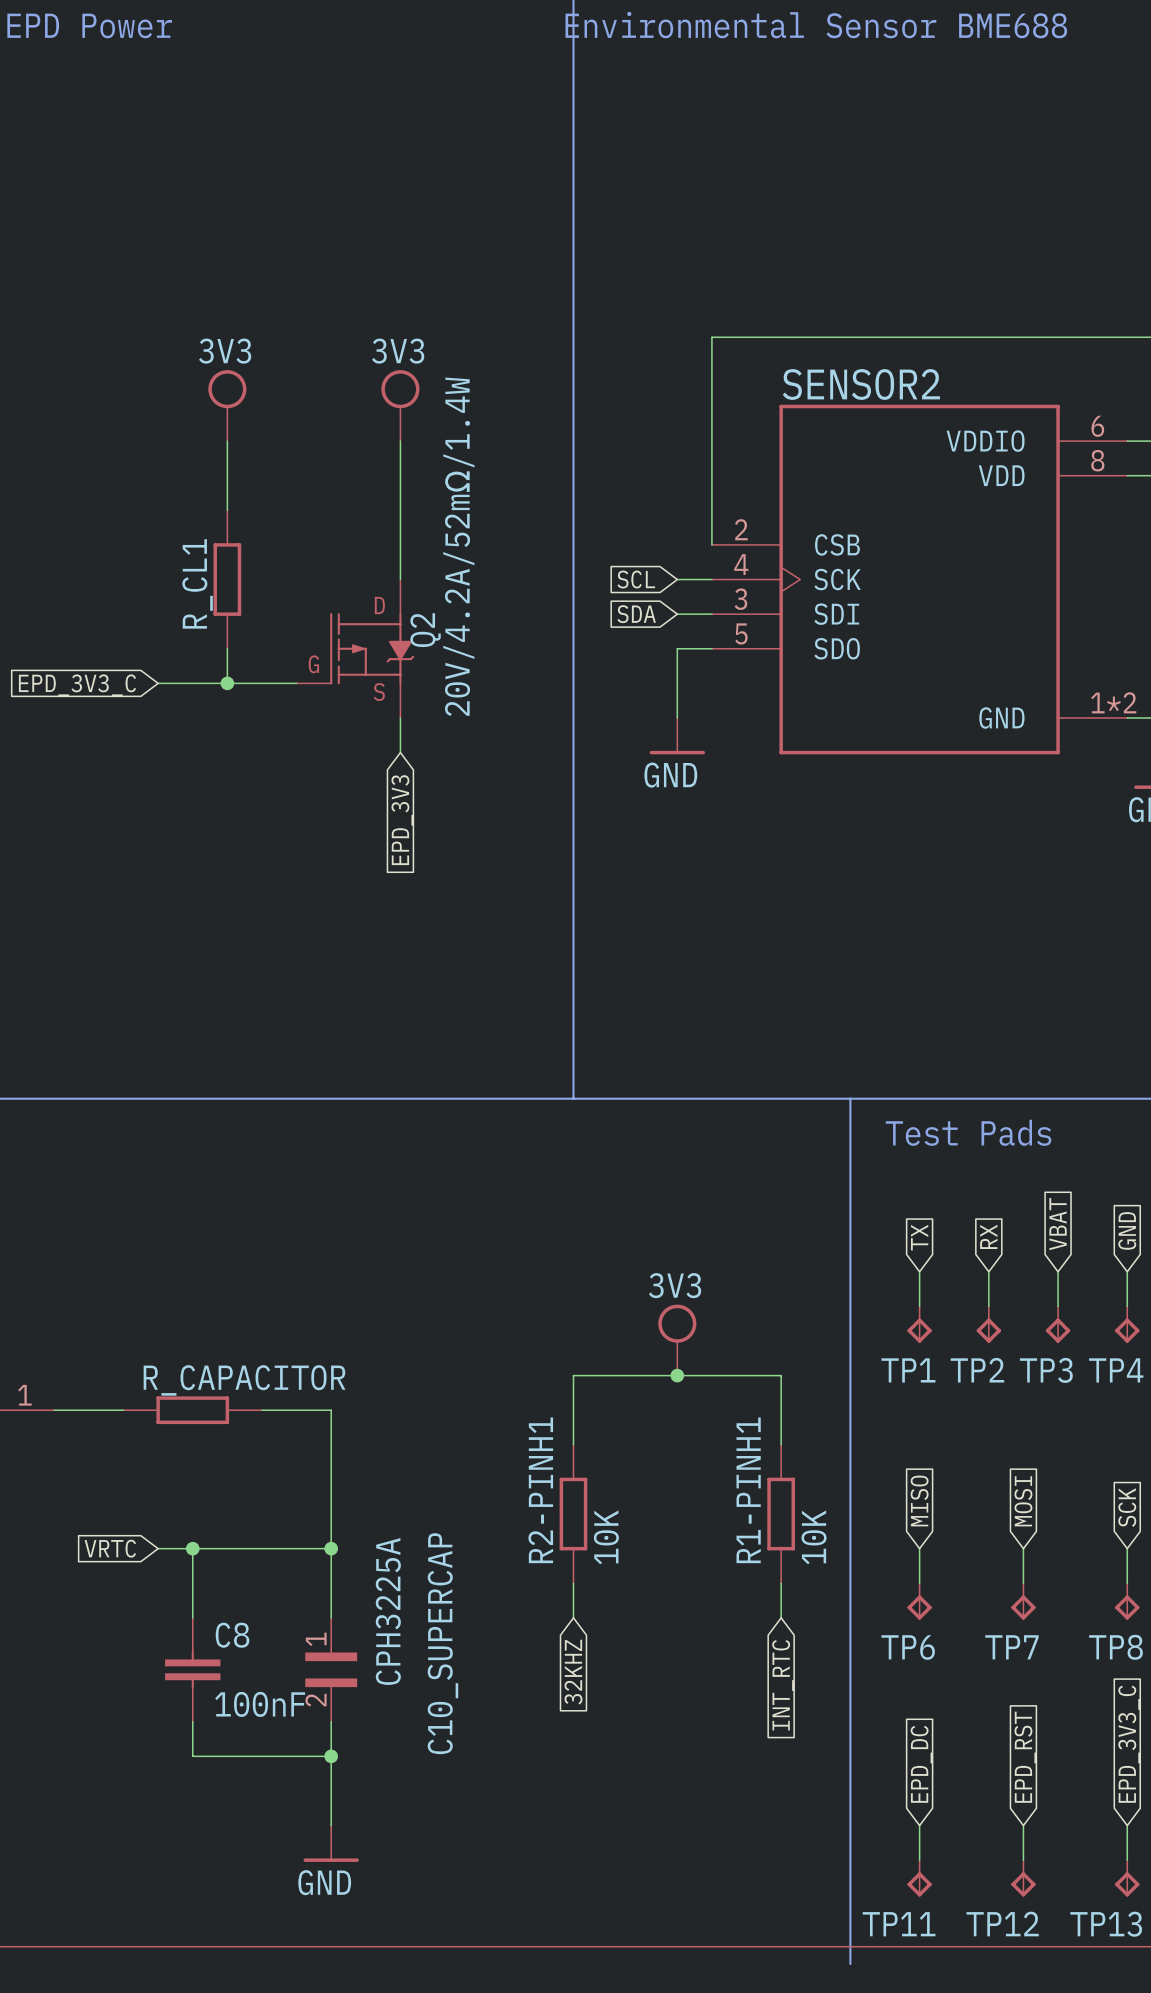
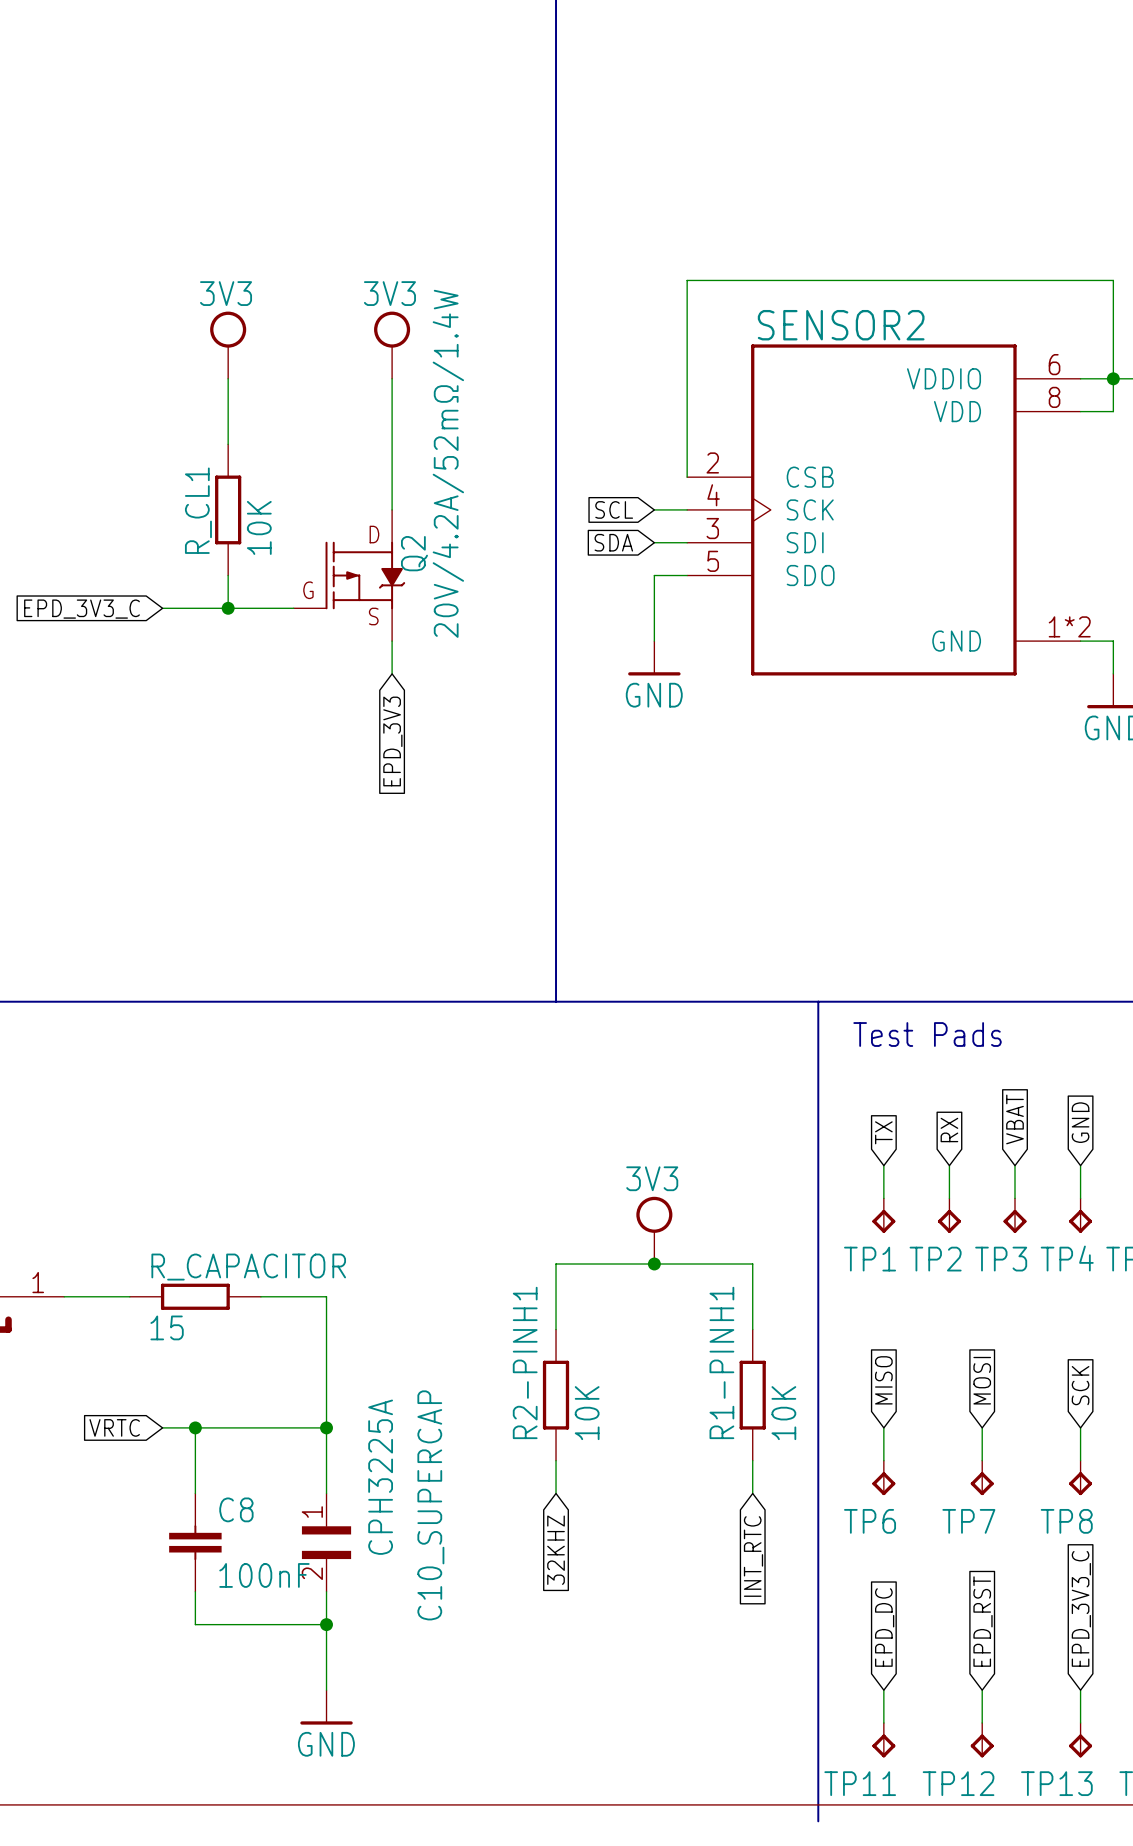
R_CL1 value: none -> 10K (259, 527)
R_CAPACITOR value: none -> 15 (167, 1327)

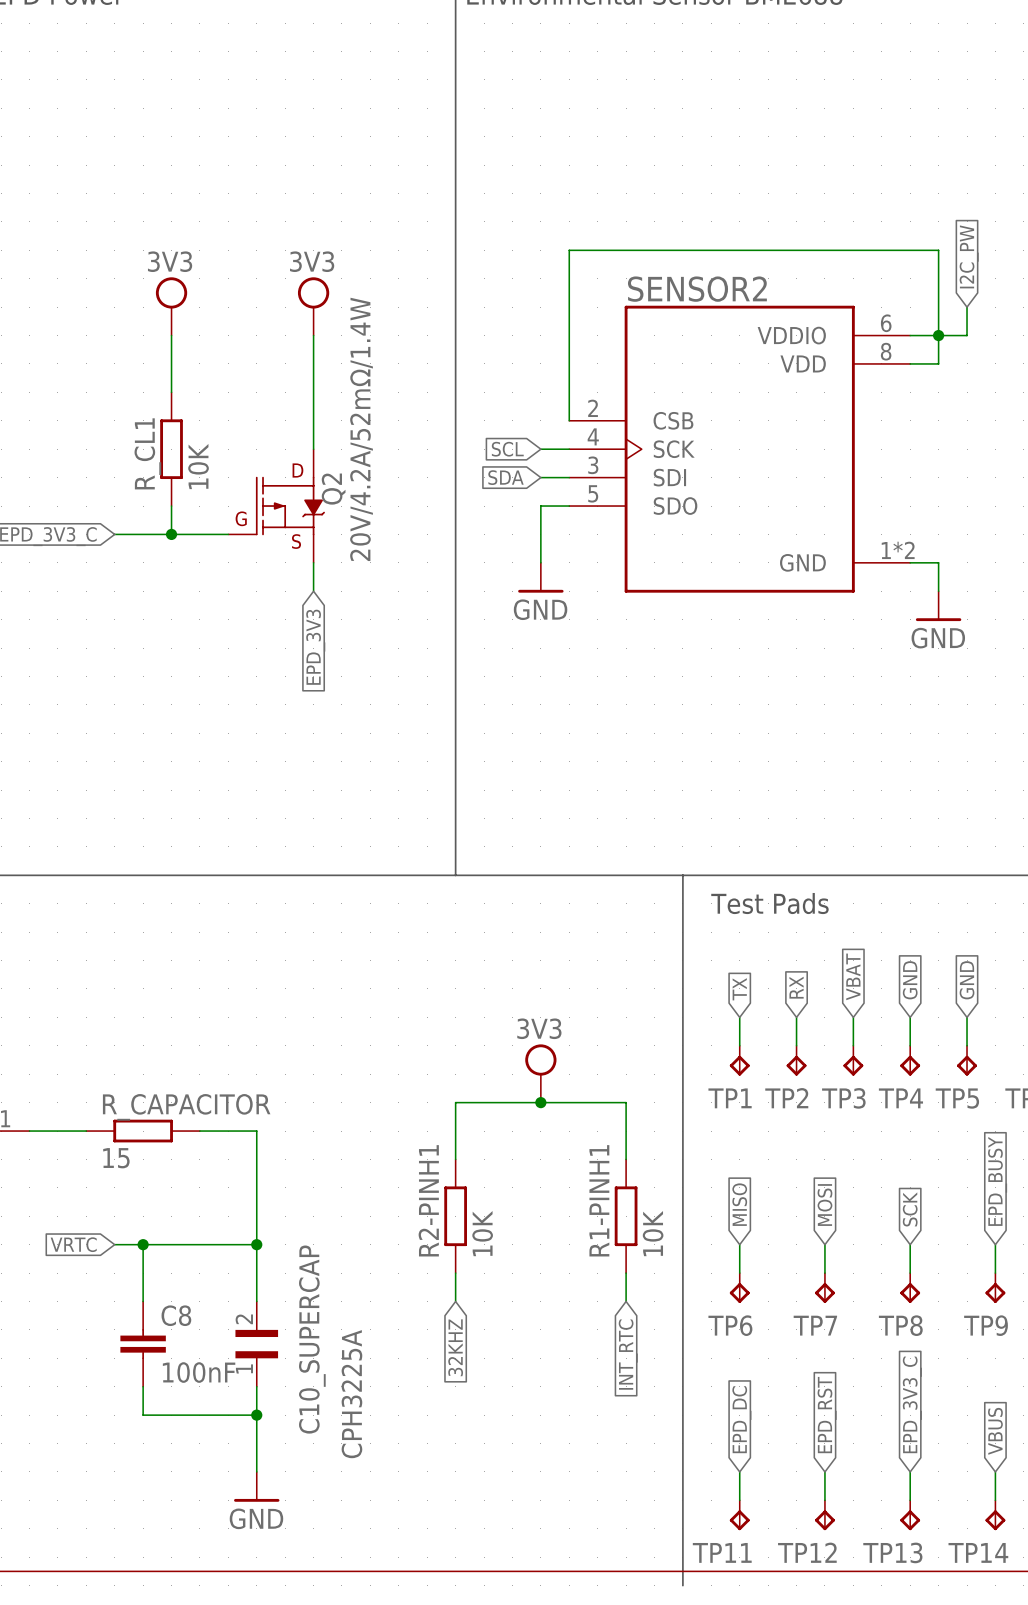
C10_SUPERCAP value position: CPH3225A (380, 1477) -> CPH3225A (351, 1394)
C10_SUPERCAP name position: C10_SUPERCAP (430, 1505) -> C10_SUPERCAP (312, 1339)
C10_SUPERCAP rotation: 0° (326, 1542) -> 180° (256, 1344)

